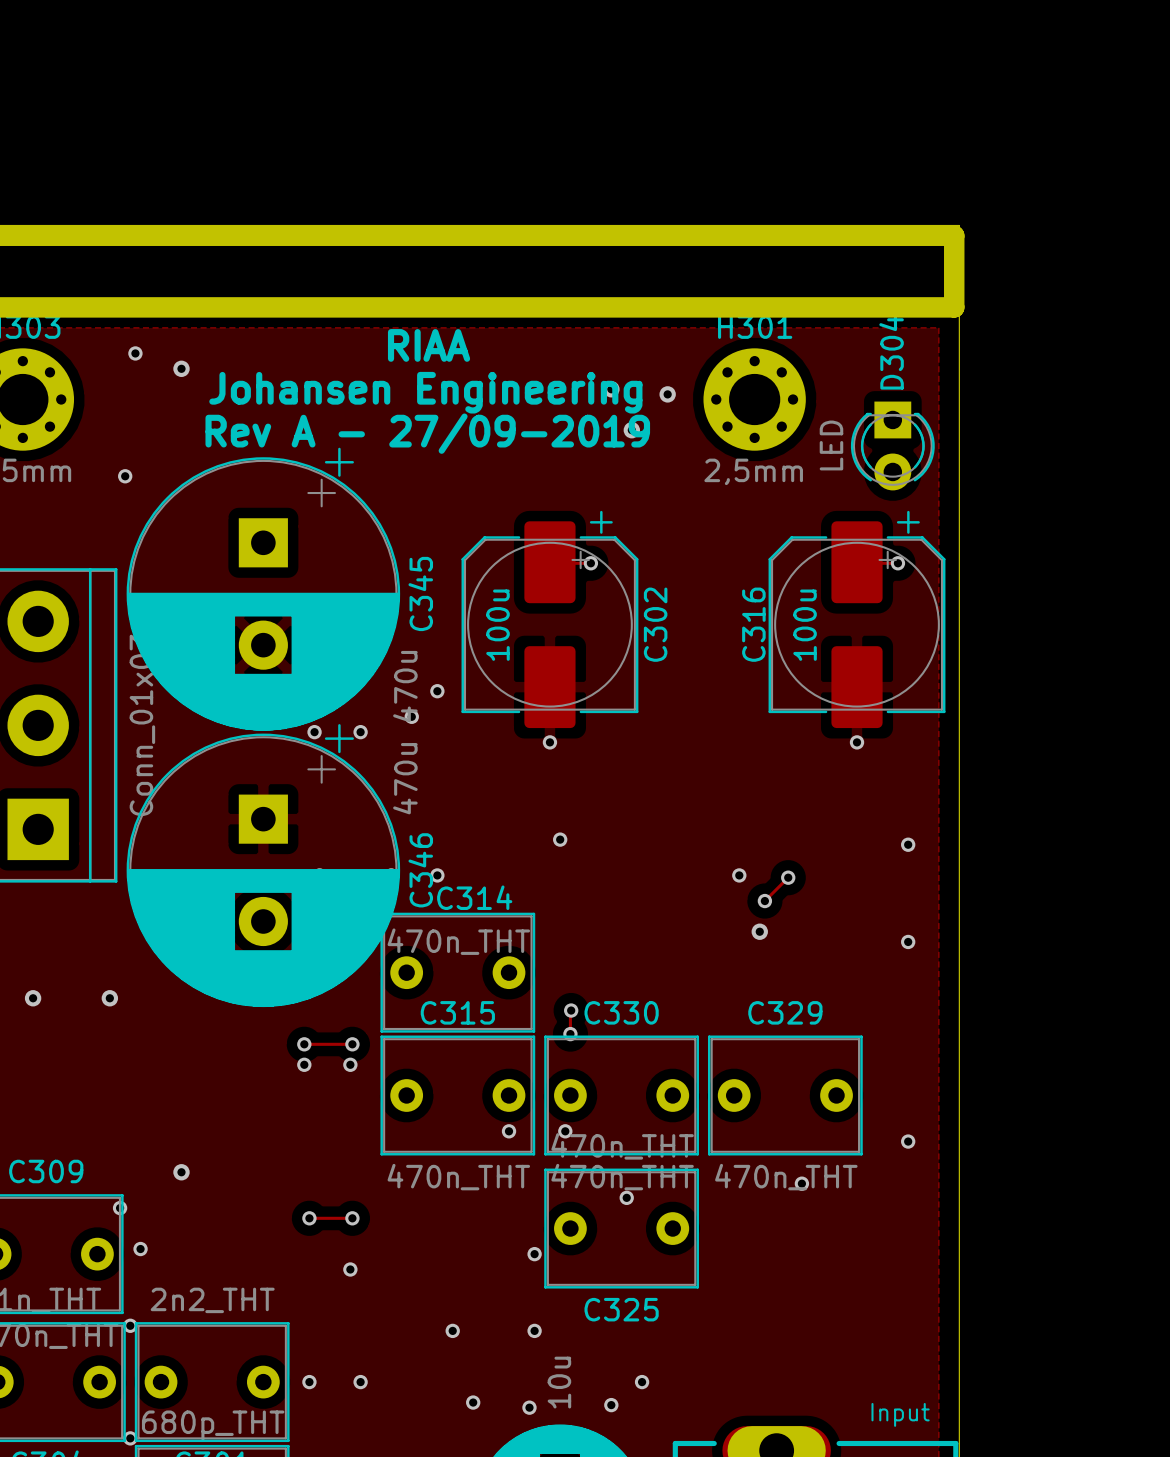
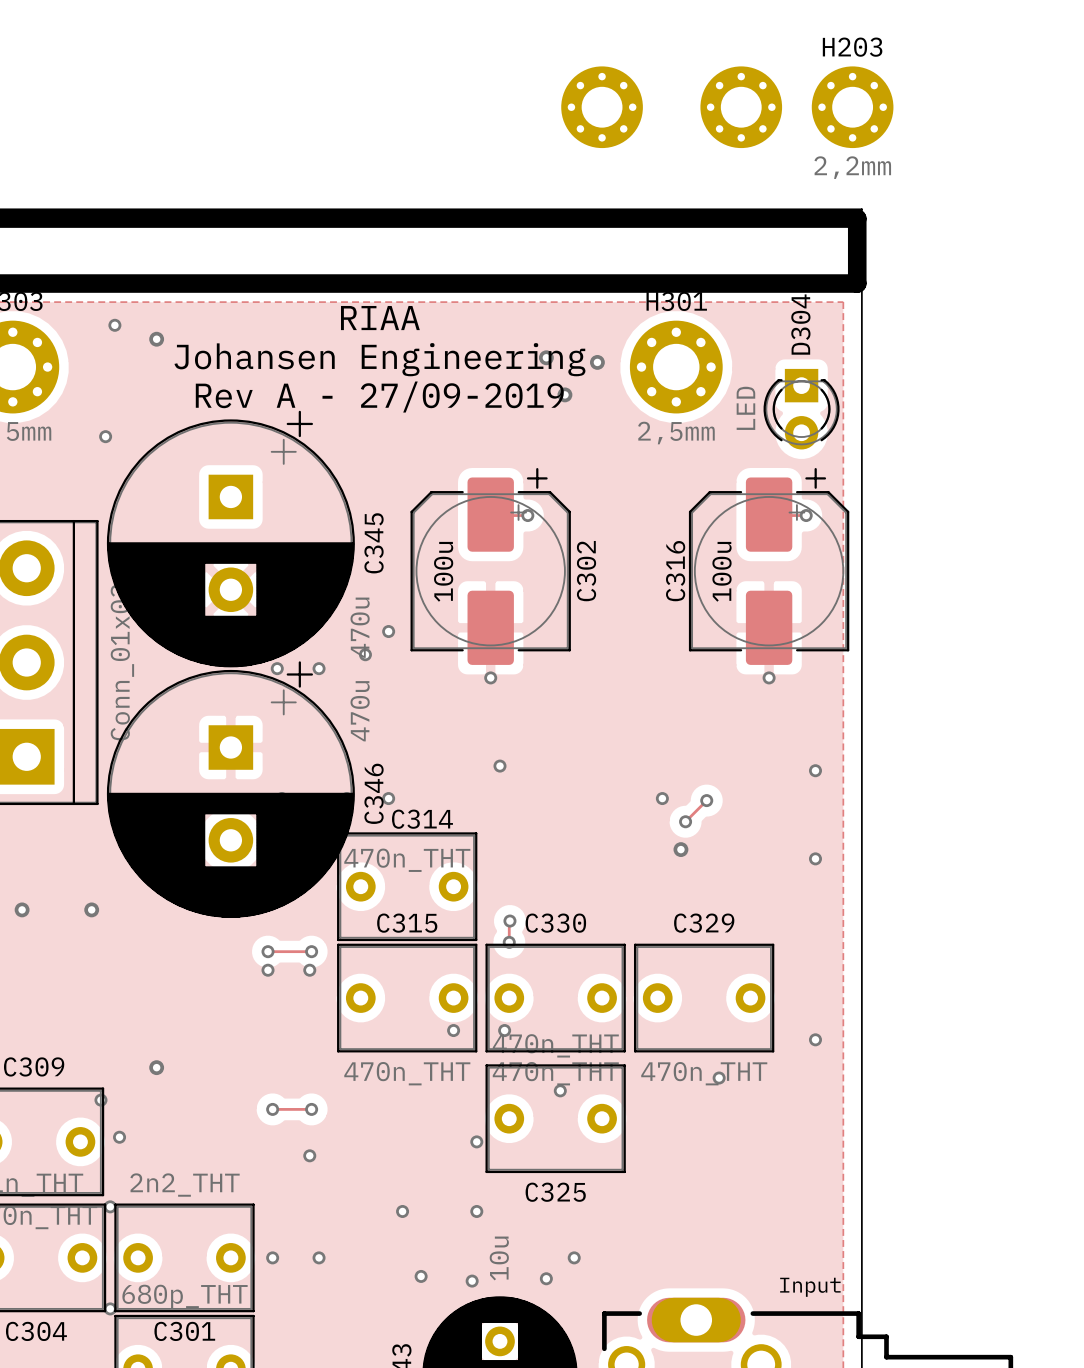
part: none -> (602, 107)
part: none -> (741, 107)
H203: none -> 2,2mm (852, 107)

